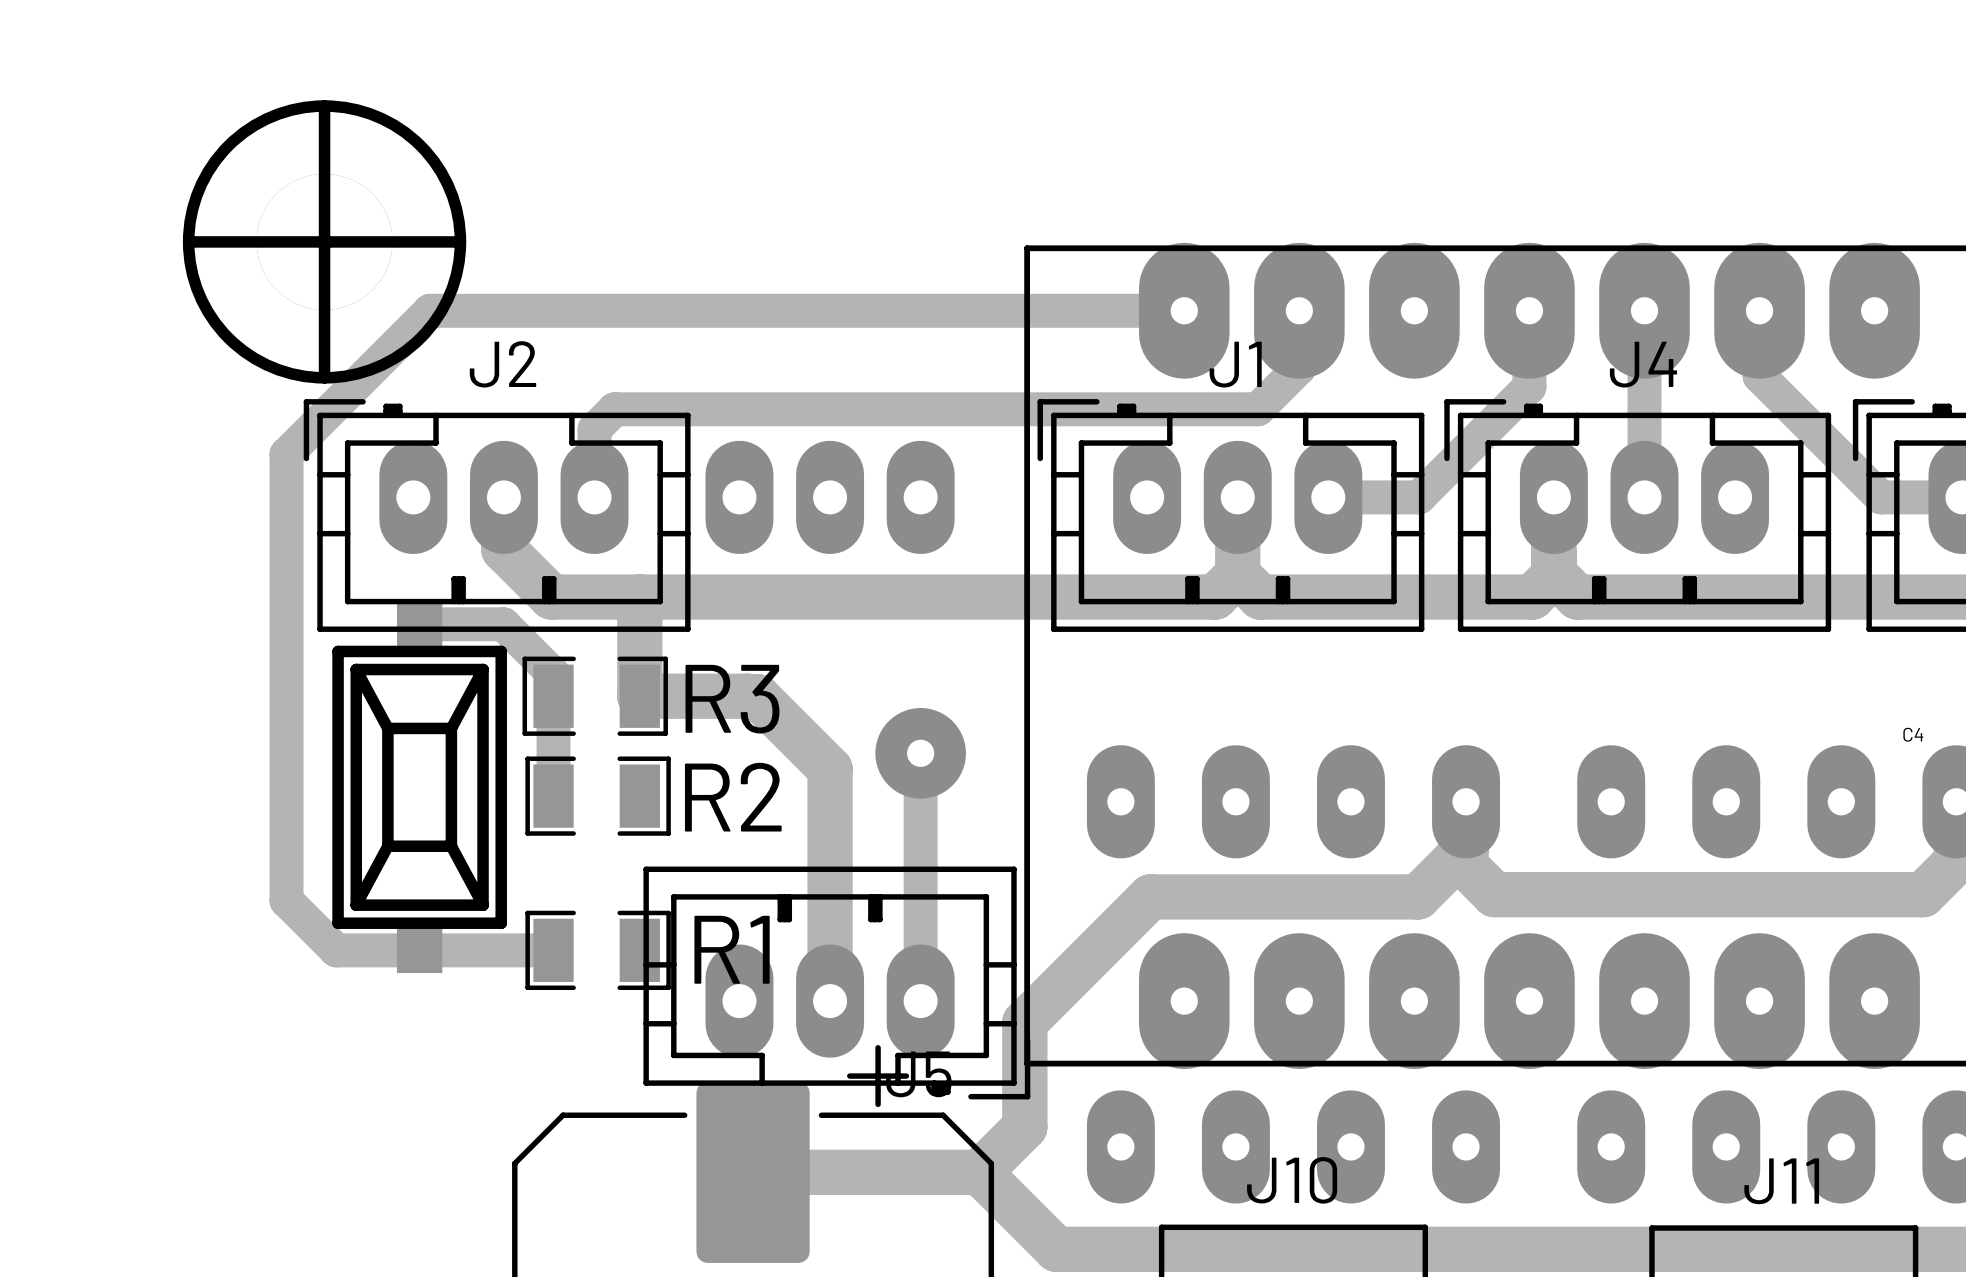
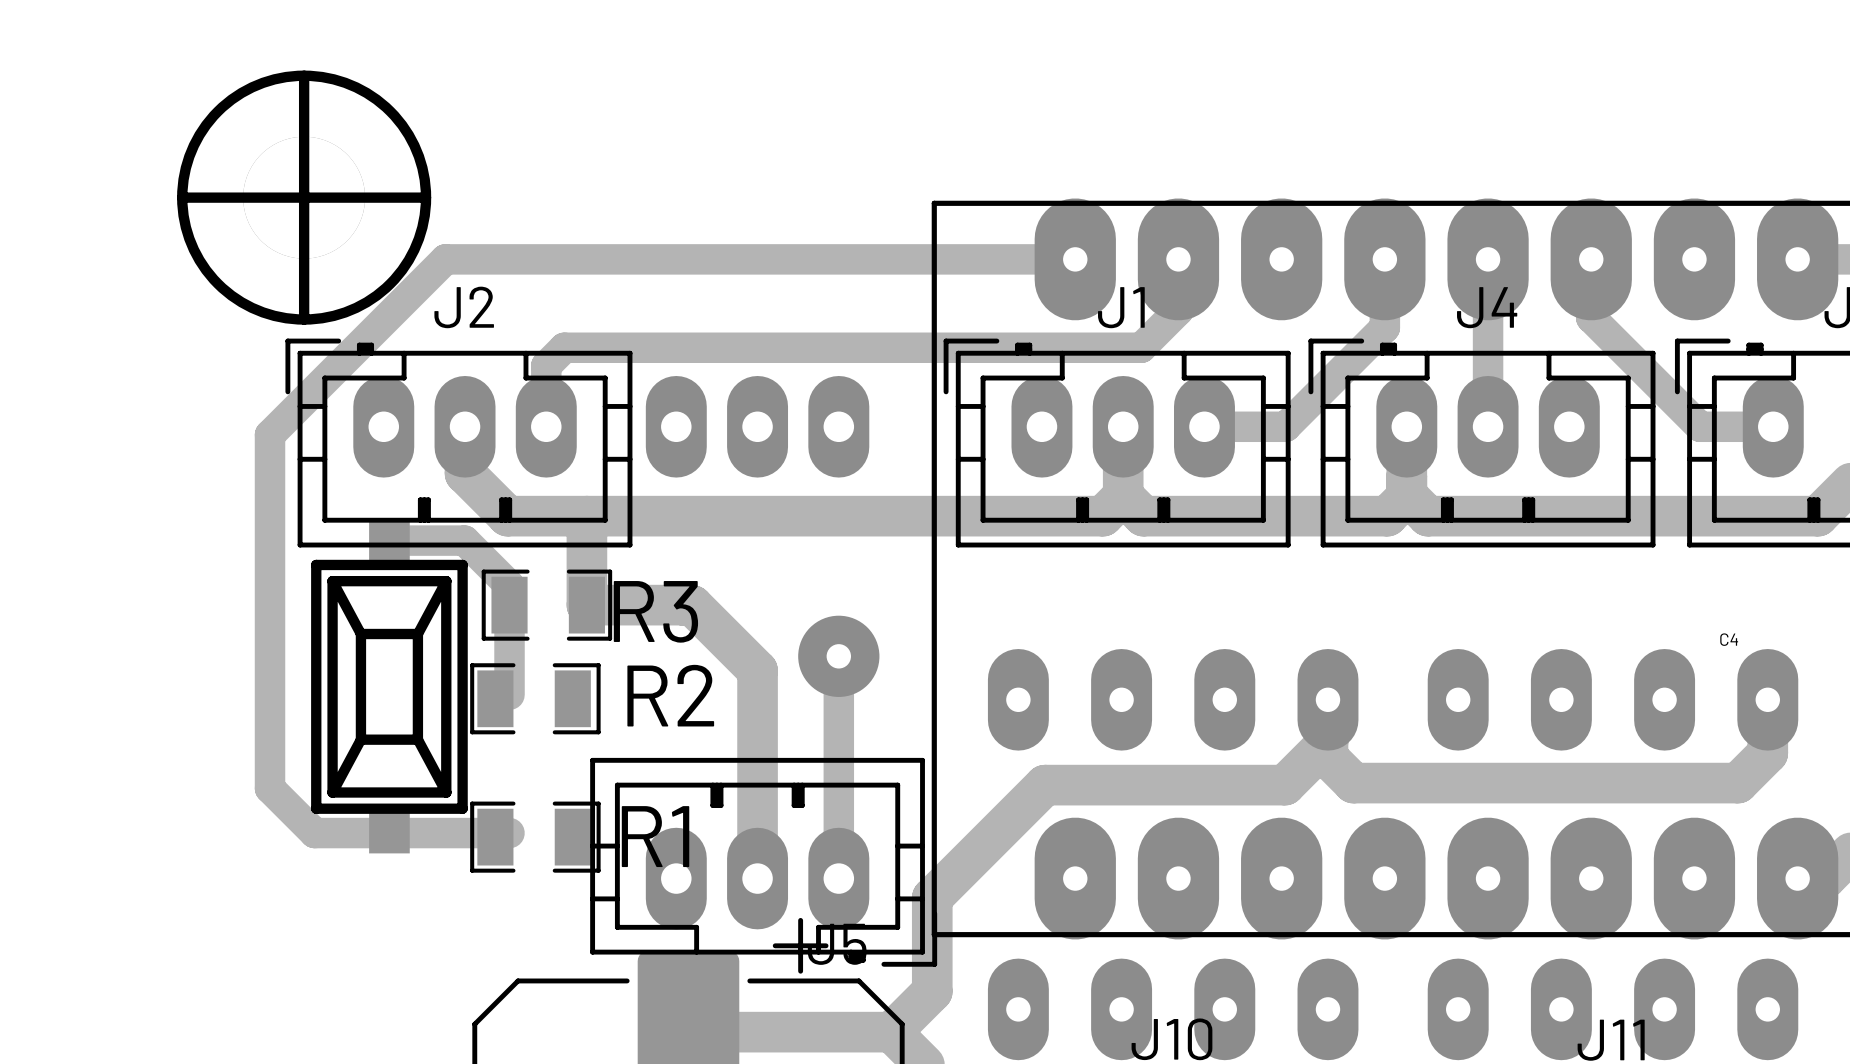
track: (482, 310) (430, 310) (286, 454) (286, 506) -> (445, 259) (270, 434)
R3 position: (598, 796) -> (535, 698)
R1 position: (598, 950) -> (535, 837)

